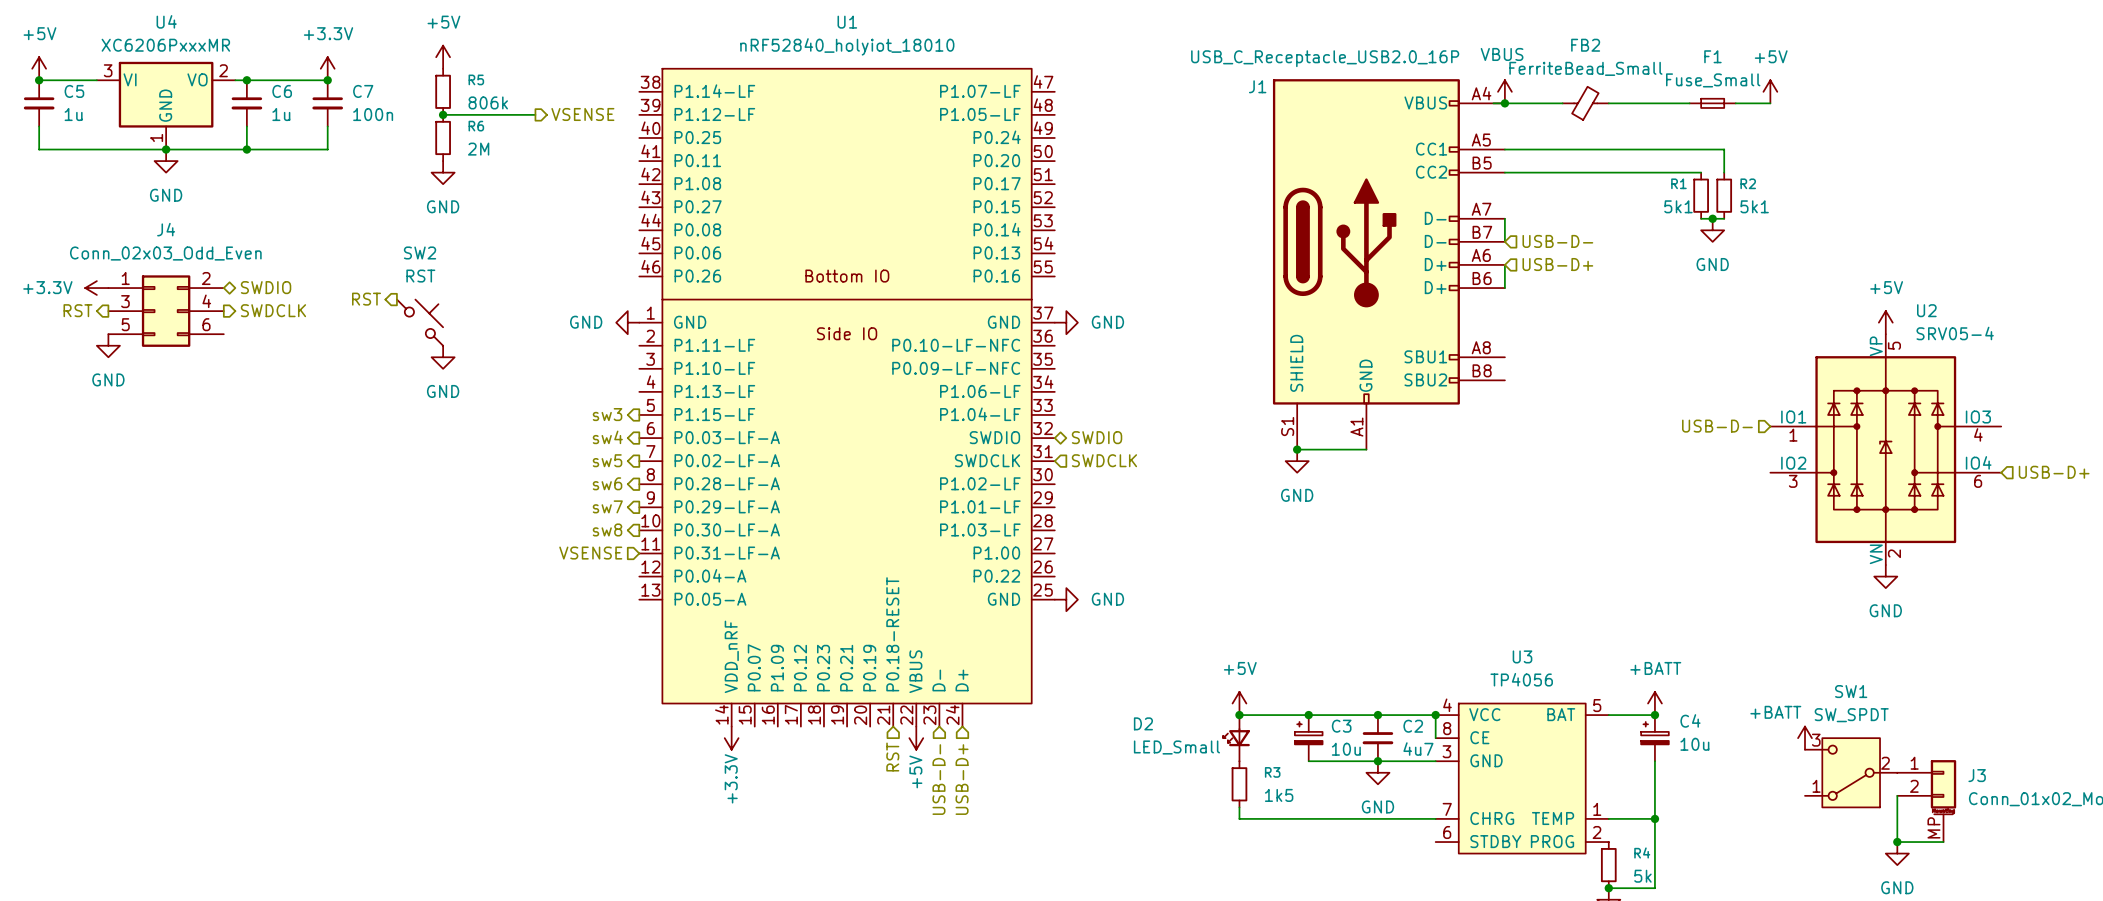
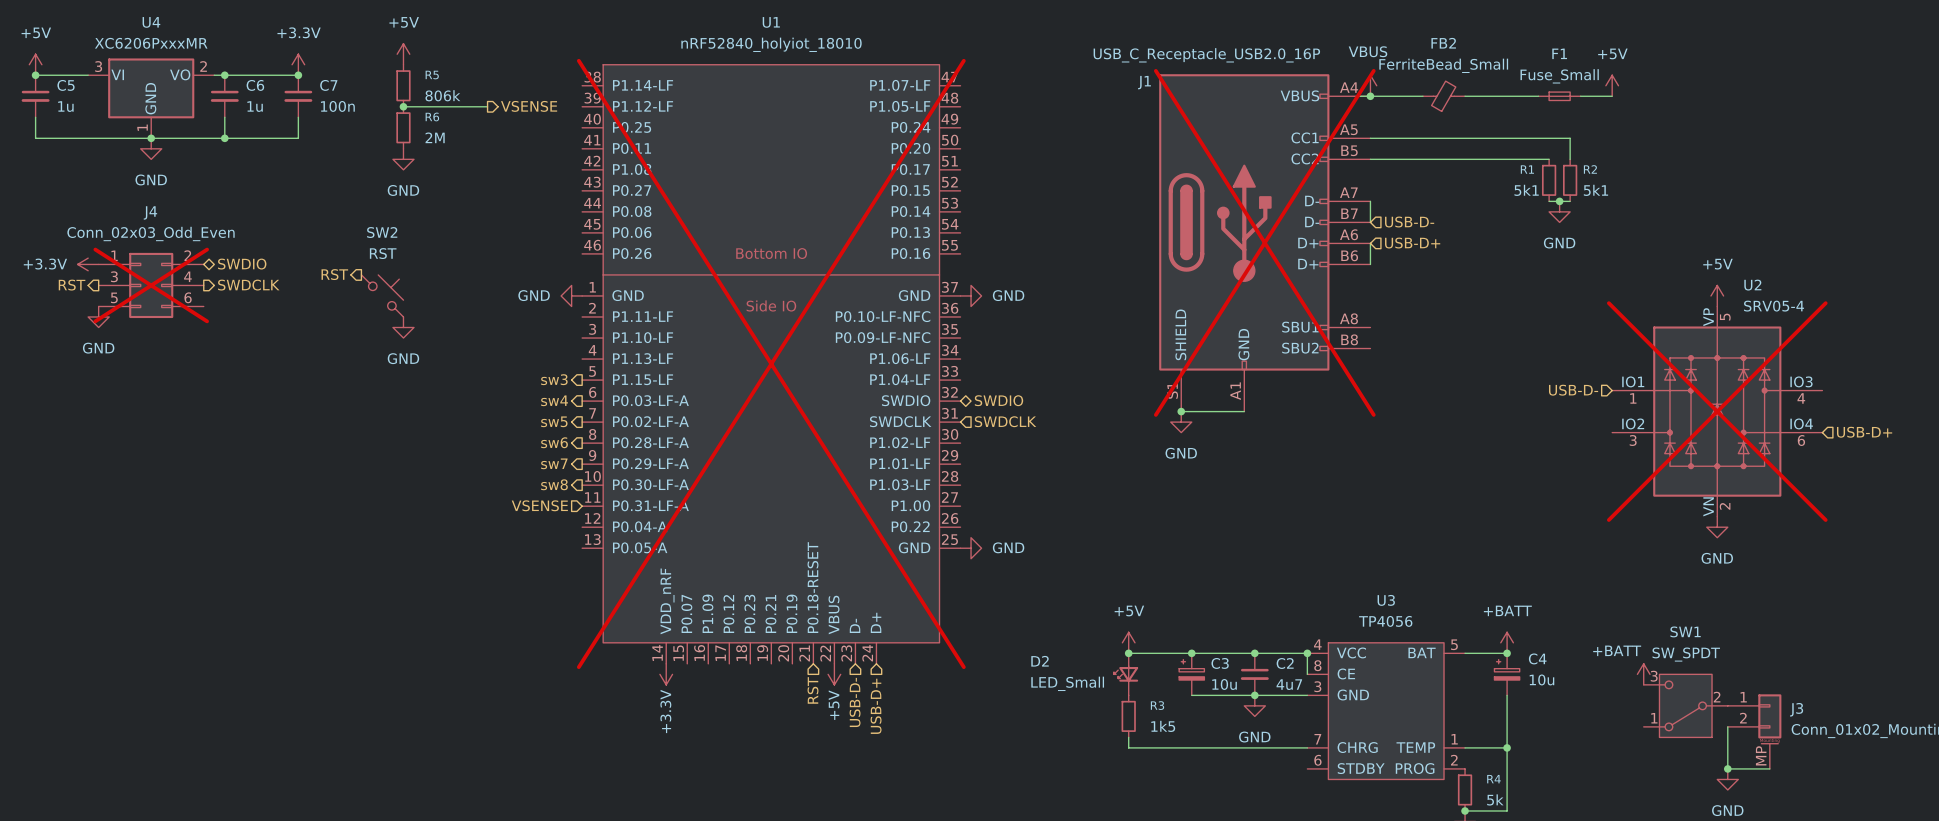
J1 do-not-place cross: none -> (1264, 242)
J4 do-not-place cross: none -> (151, 285)
U1 do-not-place cross: none -> (771, 363)
U2 do-not-place cross: none -> (1717, 411)

